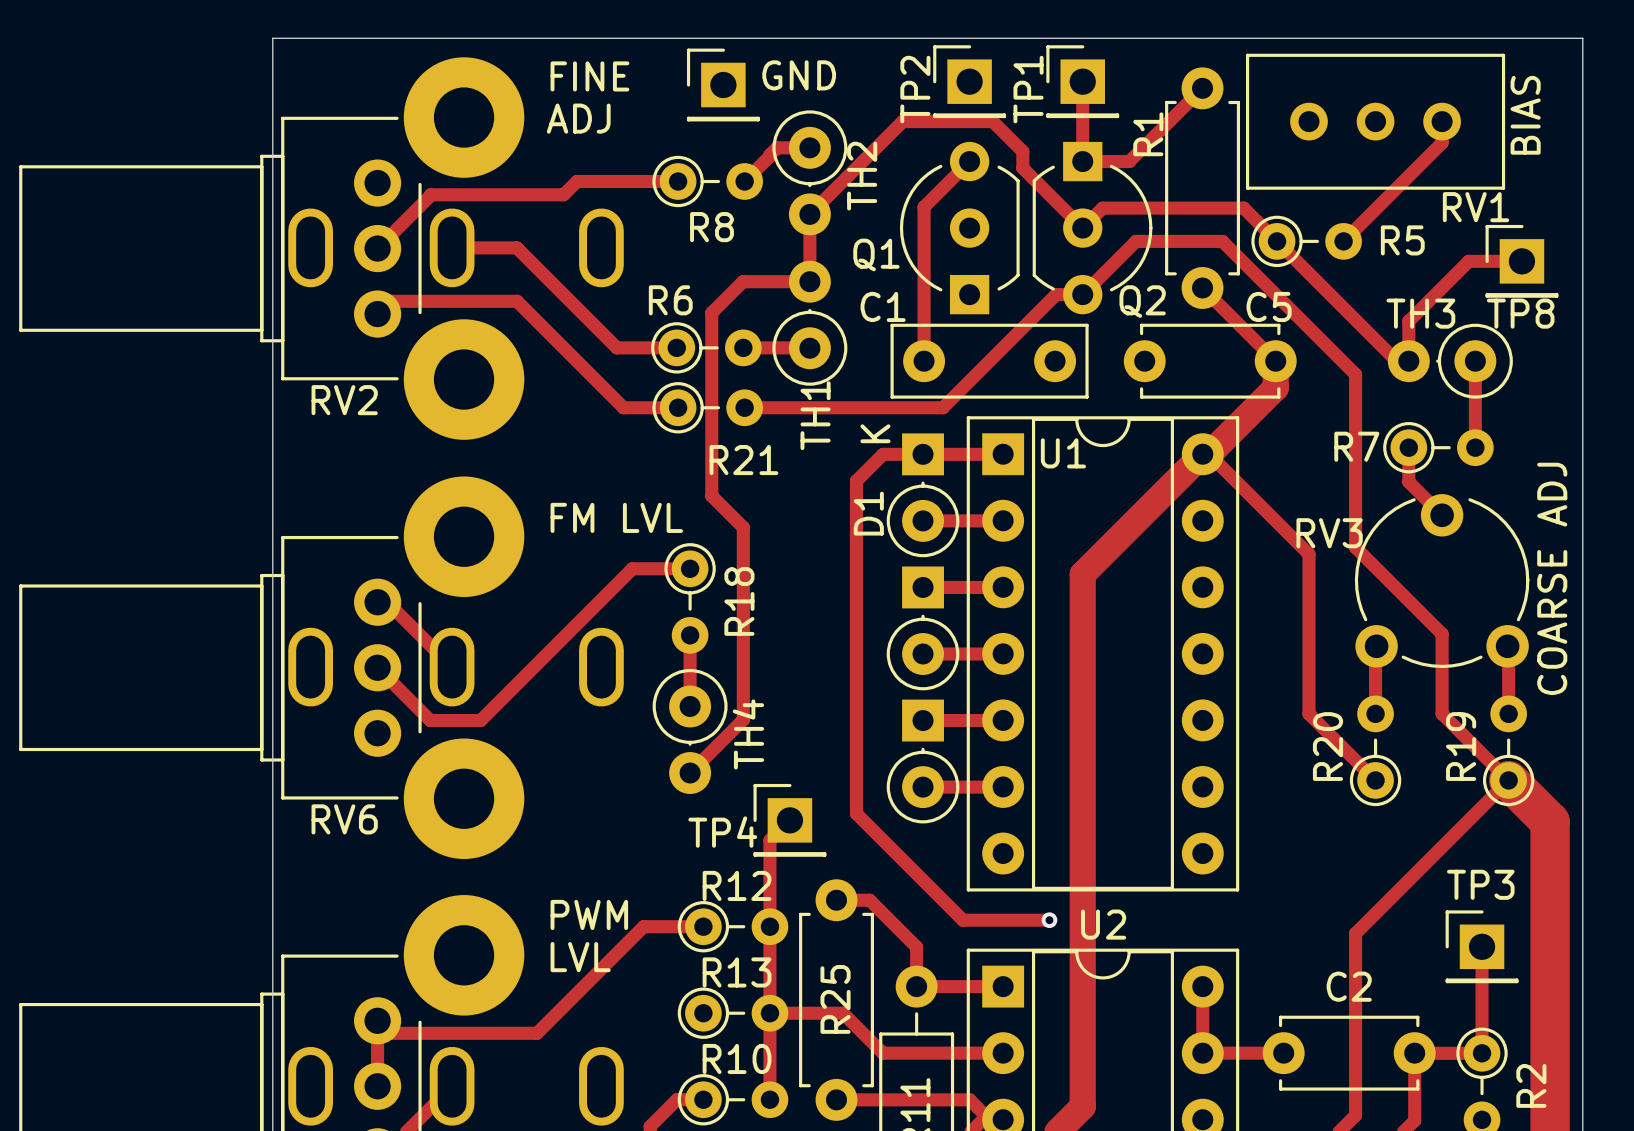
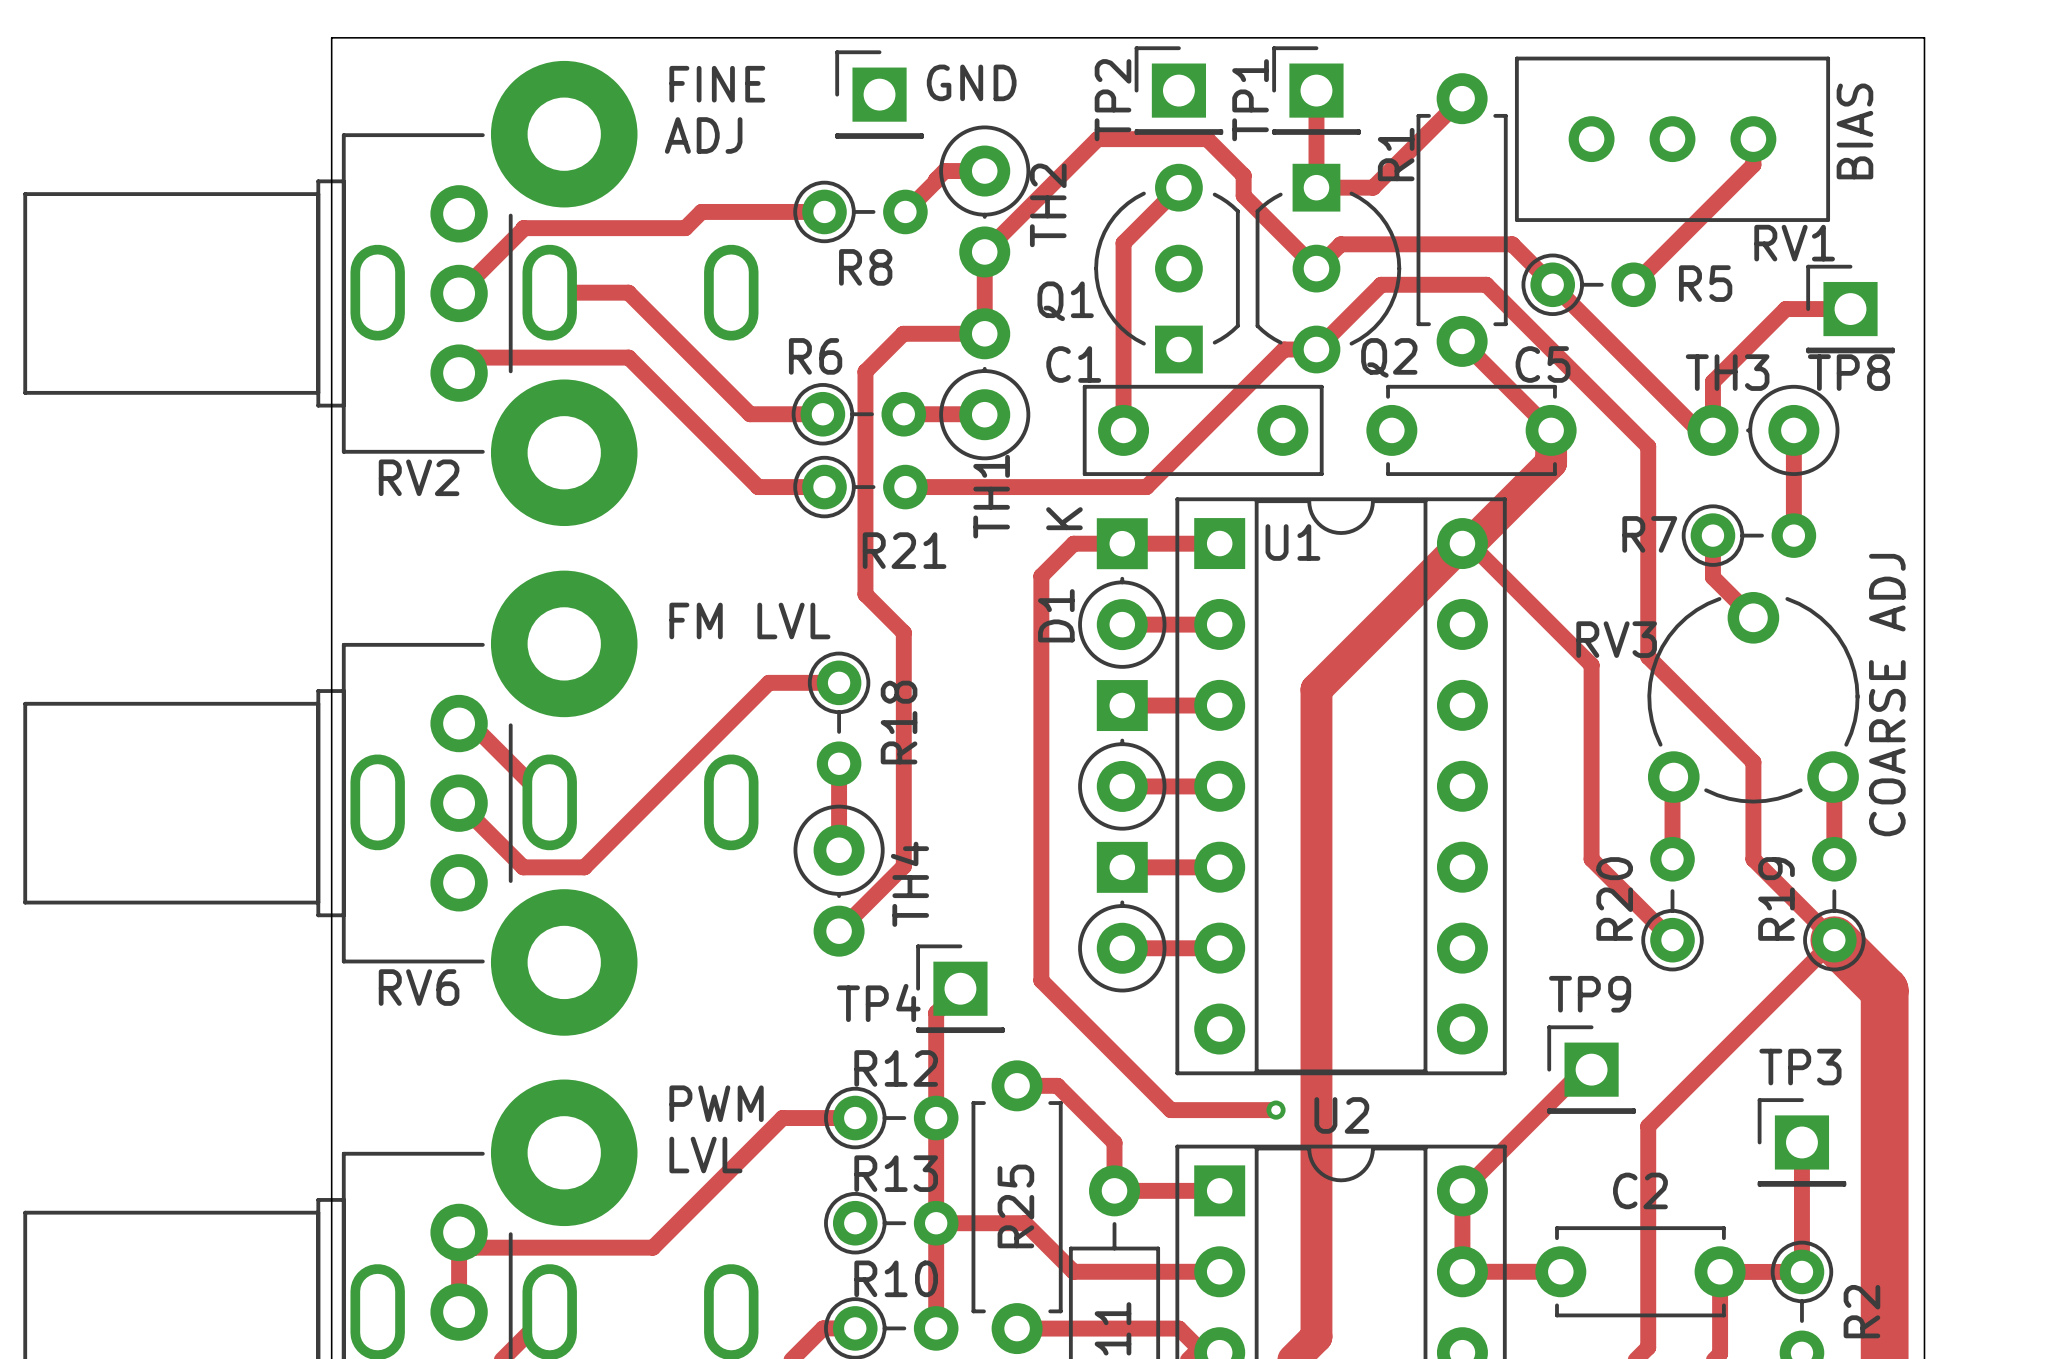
track: none -> (1591, 1069) (1583, 1069) (1462, 1190)
TP9: none -> (1591, 1069)

